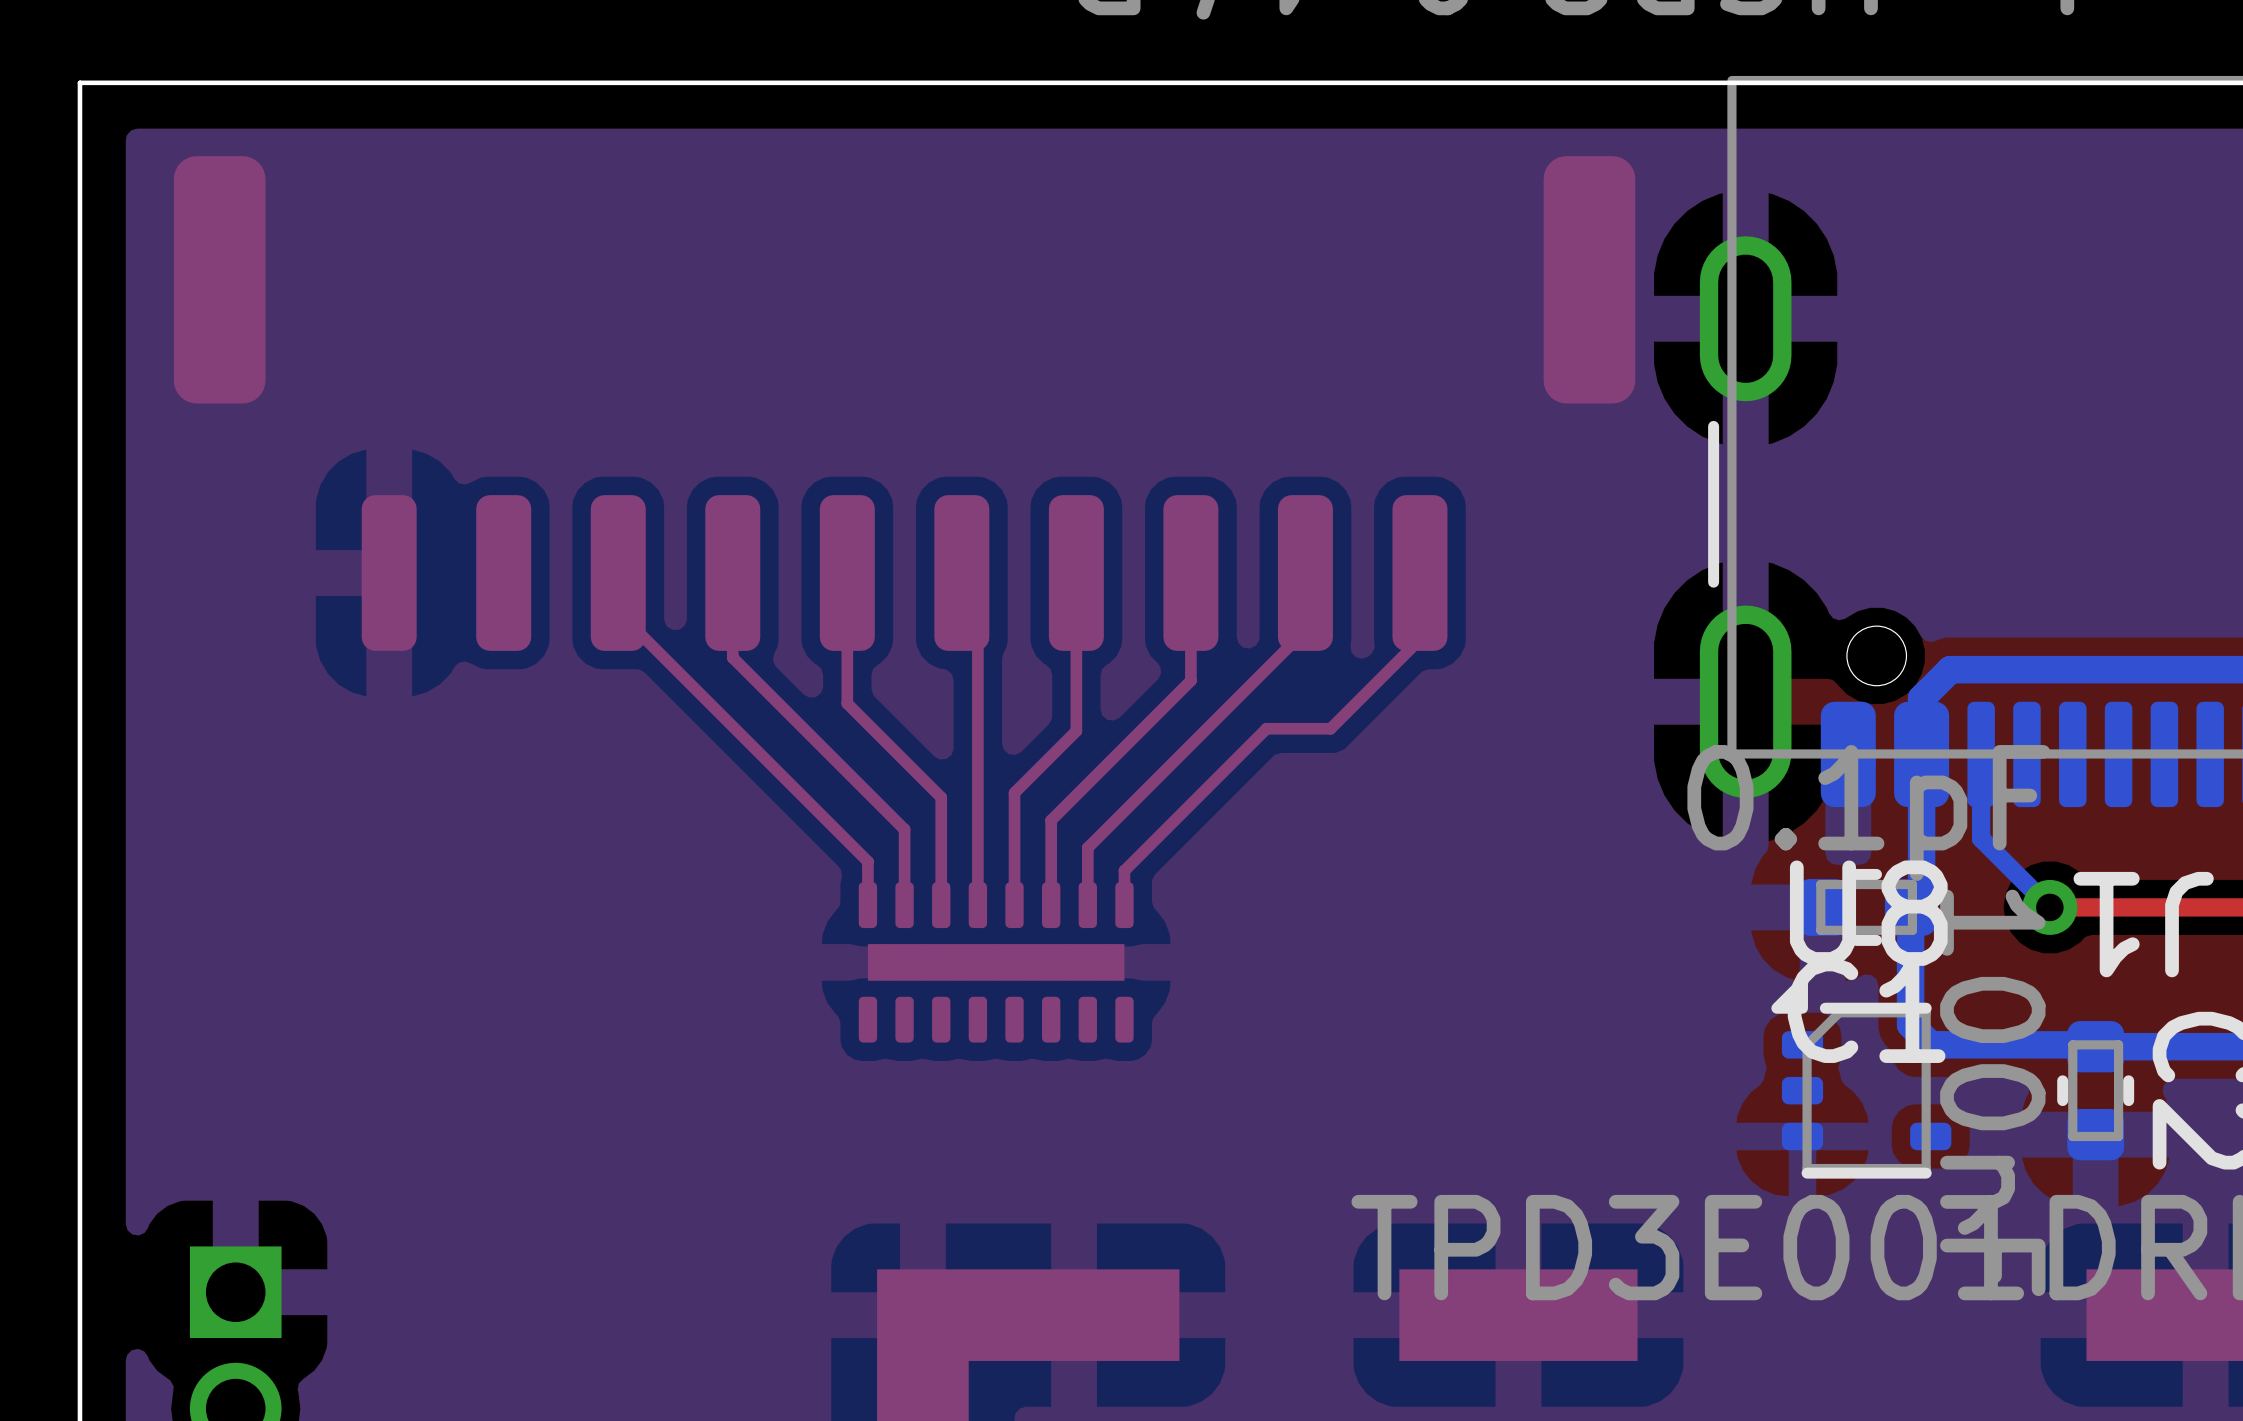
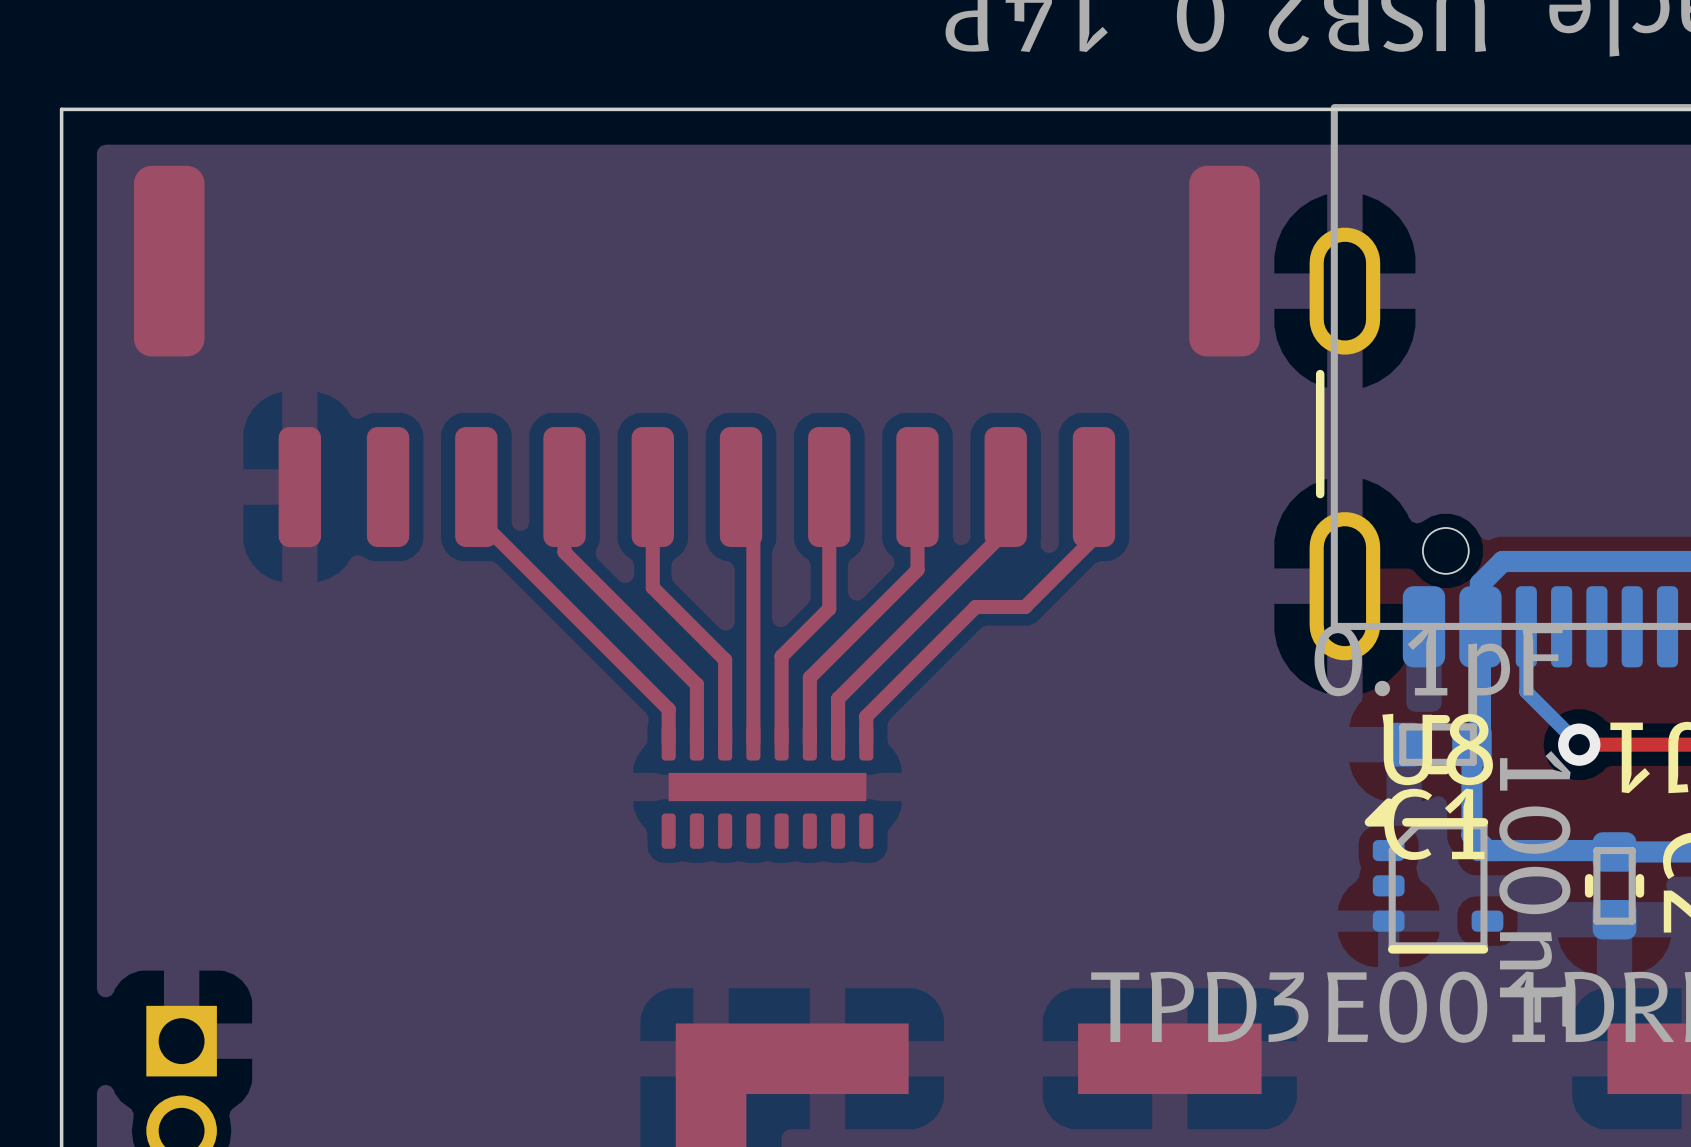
top track width: thin (732, 573) (732, 657) (904, 829) (904, 905) -> thick (564, 487) (564, 552) (696, 684) (696, 742)
top track width: thin (847, 573) (847, 703) (941, 797) (941, 905) -> thick (652, 487) (652, 587) (725, 659) (725, 742)
top track width: thin (1076, 573) (1076, 731) (1014, 792) (1014, 905) -> thick (829, 487) (829, 608) (781, 656) (781, 742)
top track width: thin (1190, 573) (1190, 680) (1051, 820) (1051, 905) -> thick (917, 487) (917, 569) (809, 677) (809, 742)
top track width: thin (977, 589) (977, 905) -> thick (753, 499) (753, 742)
top track width: thin (618, 611) (867, 861) (867, 905) -> thick (476, 517) (668, 709) (668, 742)
top track width: thin (1305, 630) (1087, 847) (1087, 905) -> thick (1005, 531) (838, 698) (838, 742)
top track width: thin (1419, 639) (1330, 728) (1266, 728) (1124, 870) (1124, 905) -> thick (1093, 538) (1025, 607) (975, 607) (866, 716) (866, 742)

